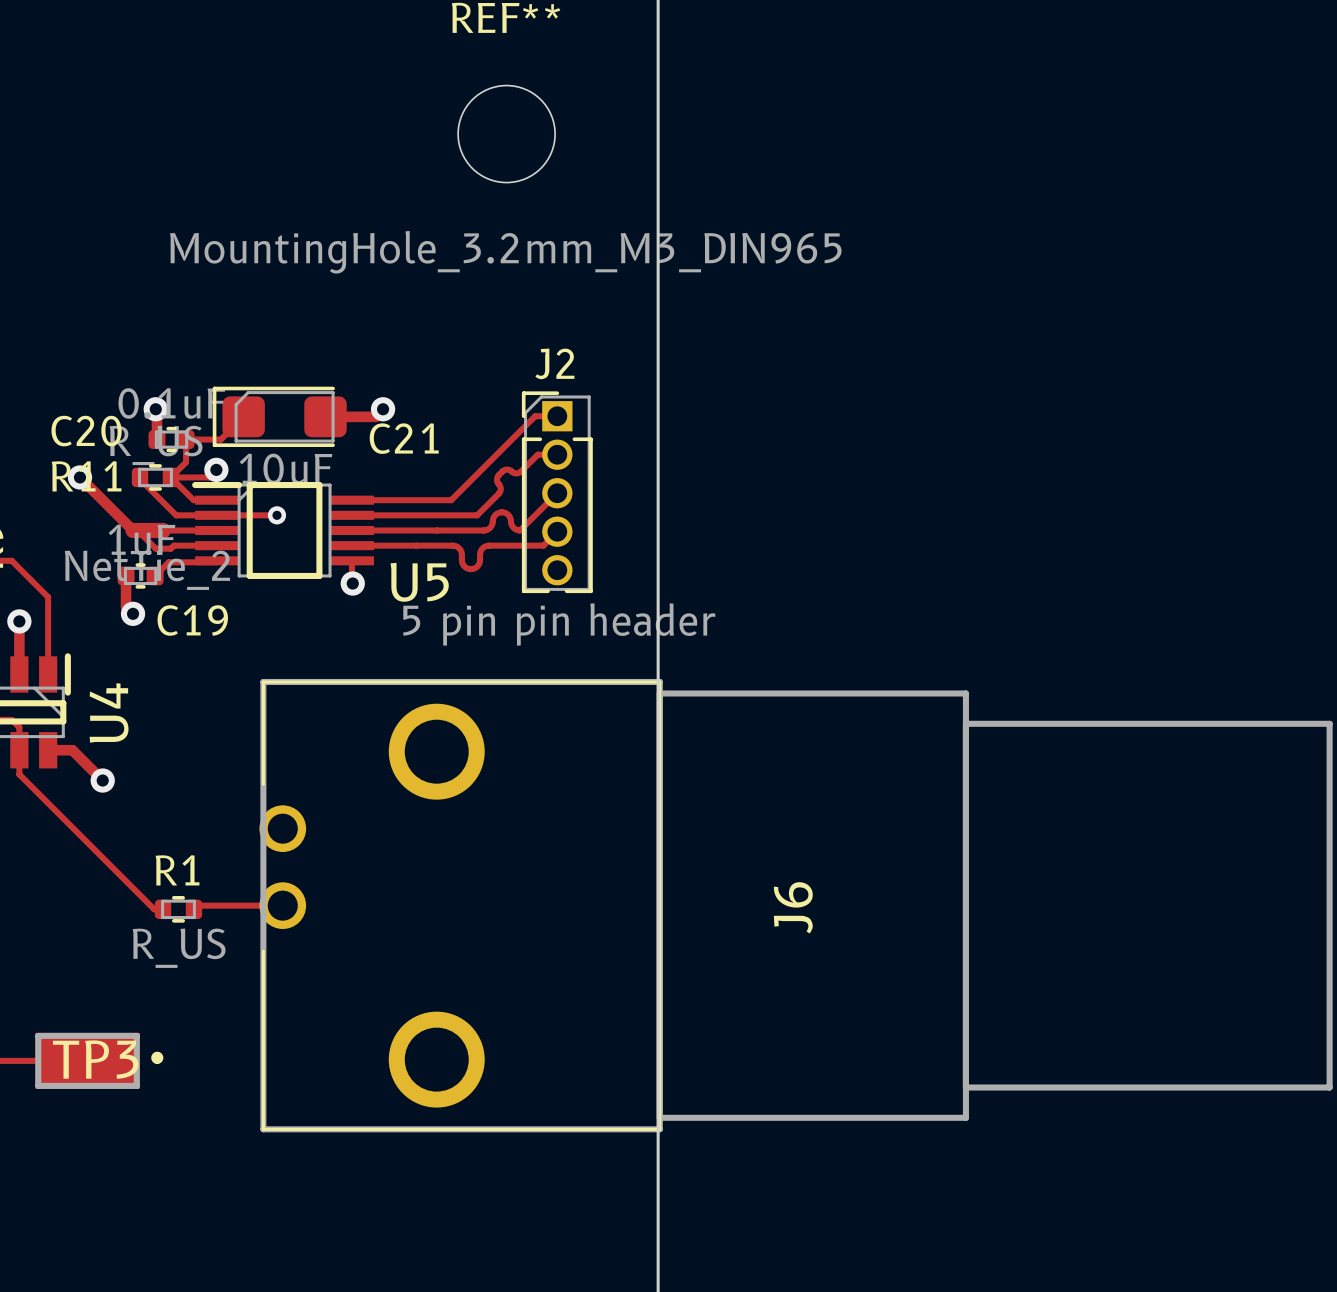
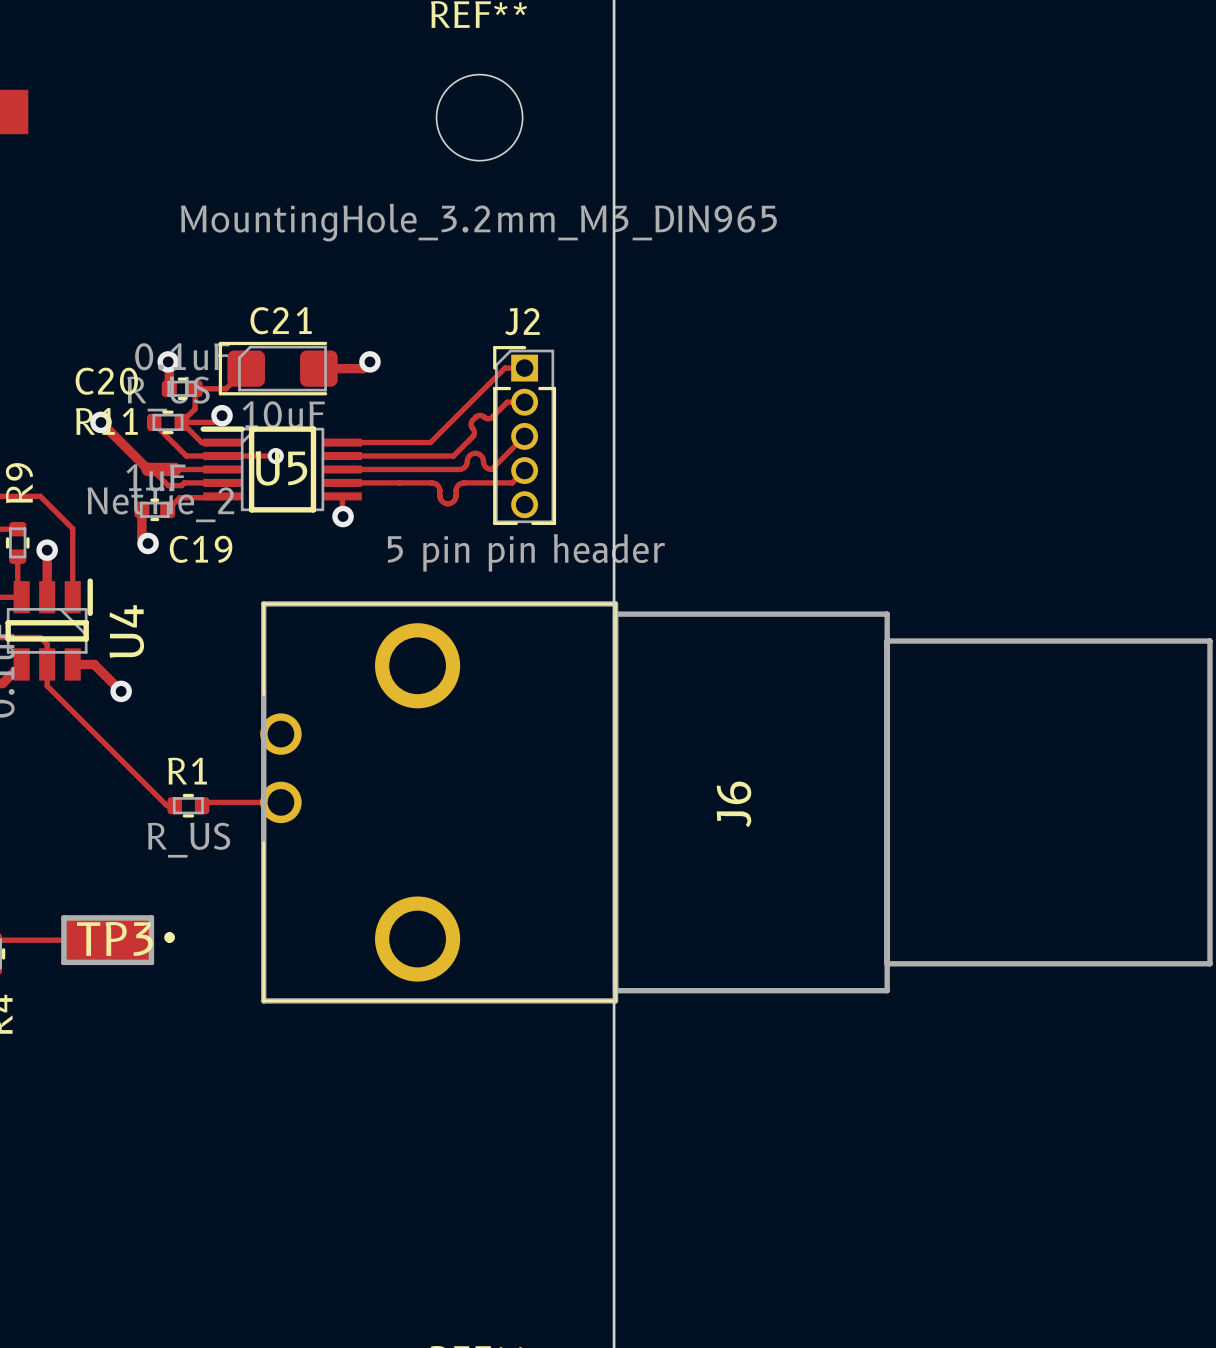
C21 name position: C21 (404, 438) -> C21 (281, 320)
U5 name position: U5 (419, 582) -> U5 (281, 468)

